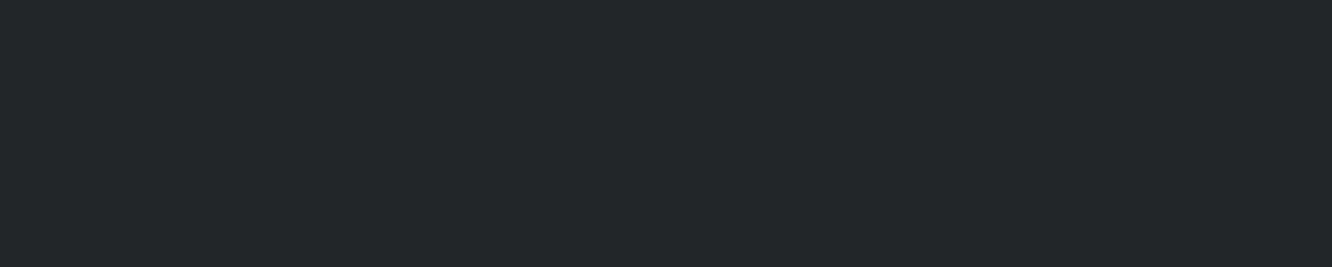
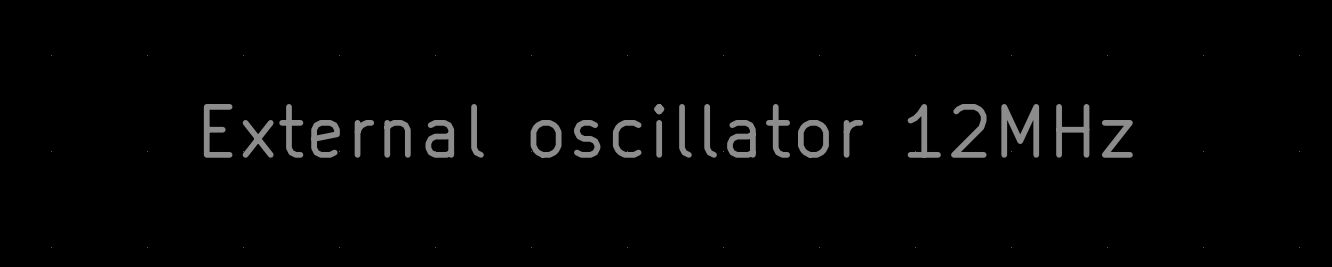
text: none -> External oscillator 12MHz (668, 130)

